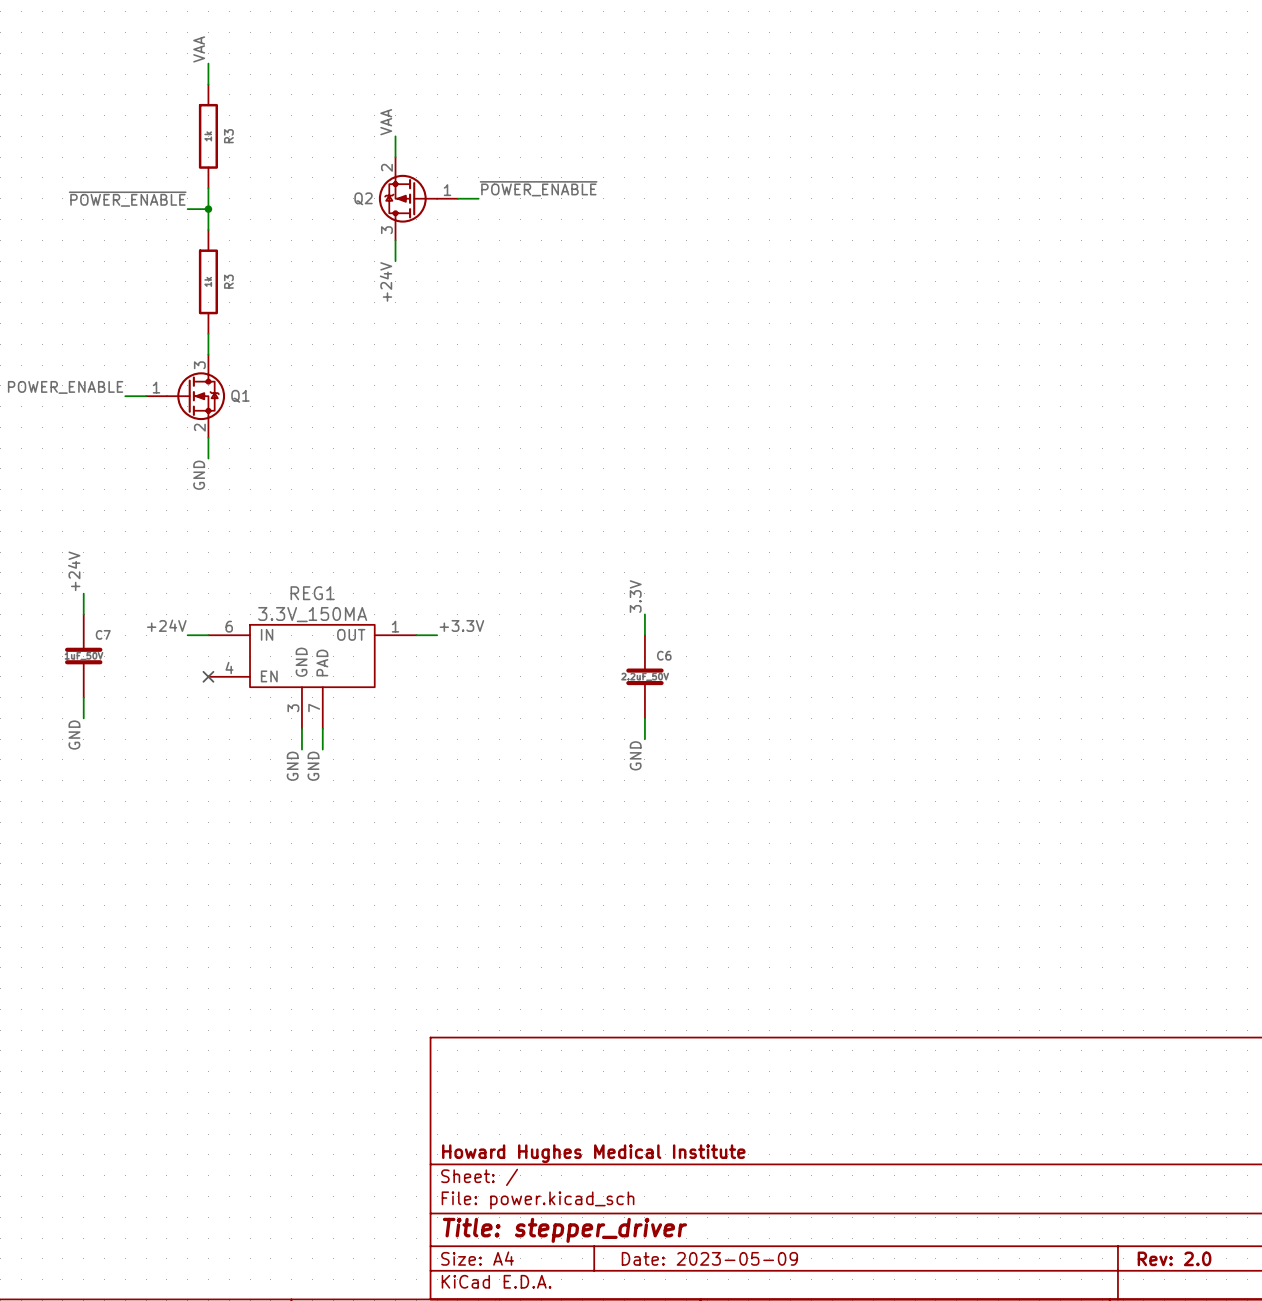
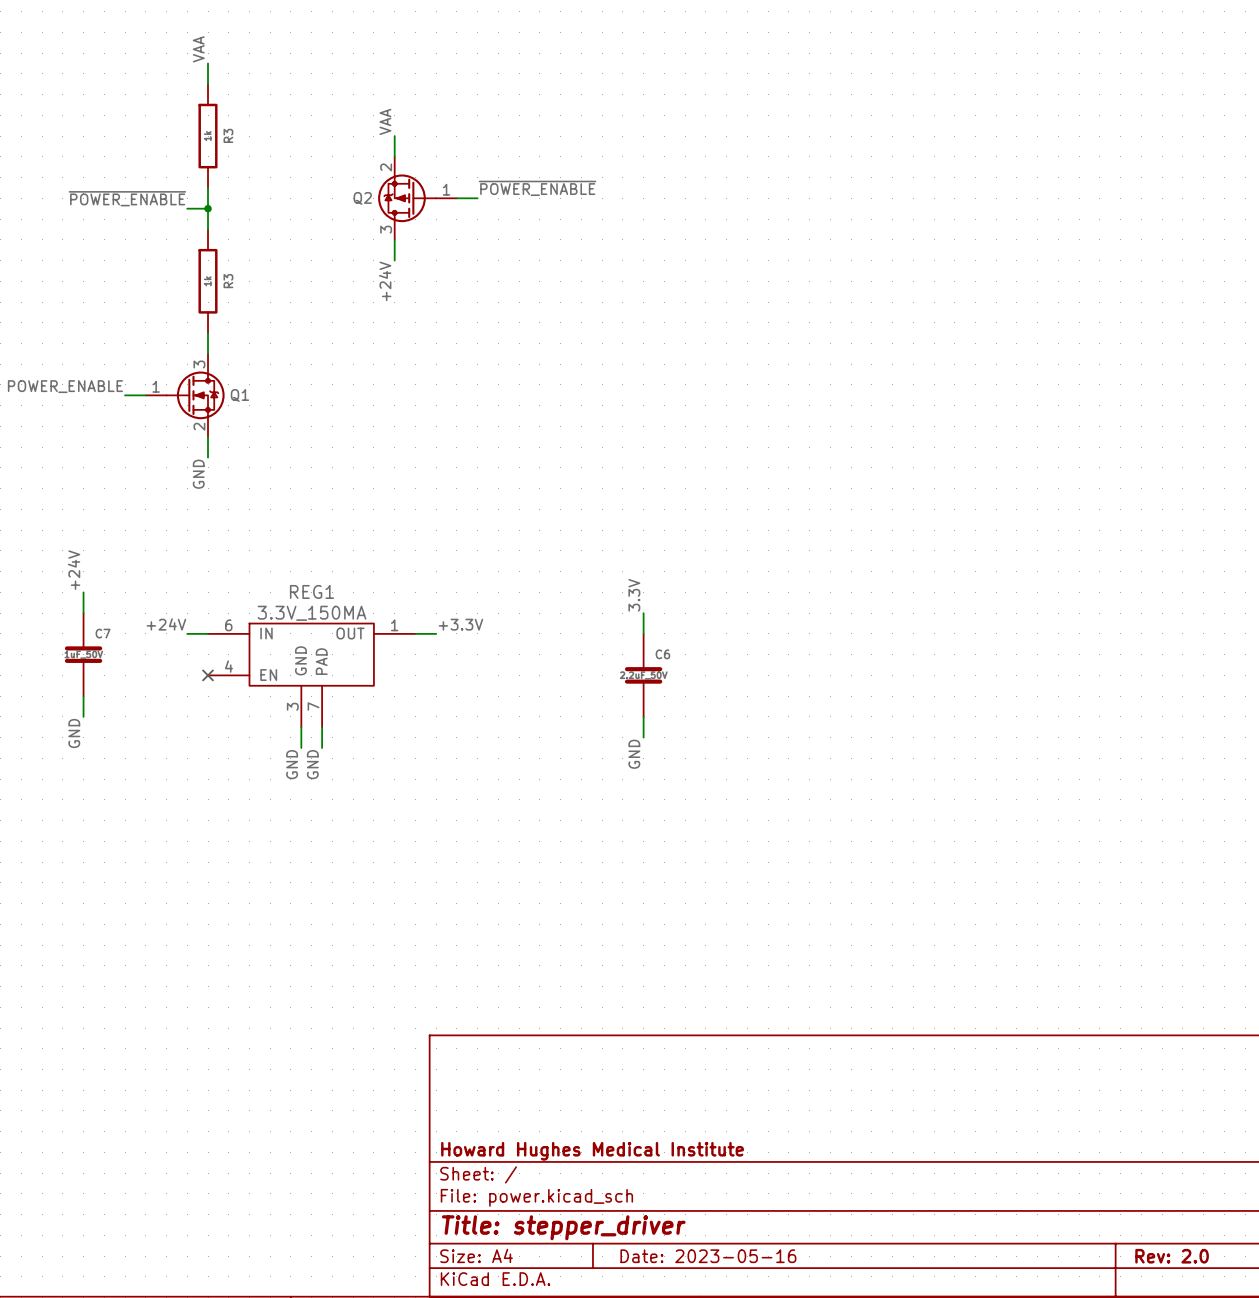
title block: Date: 2023-05-09 (709, 1258) -> Date: 2023-05-16 (708, 1256)

